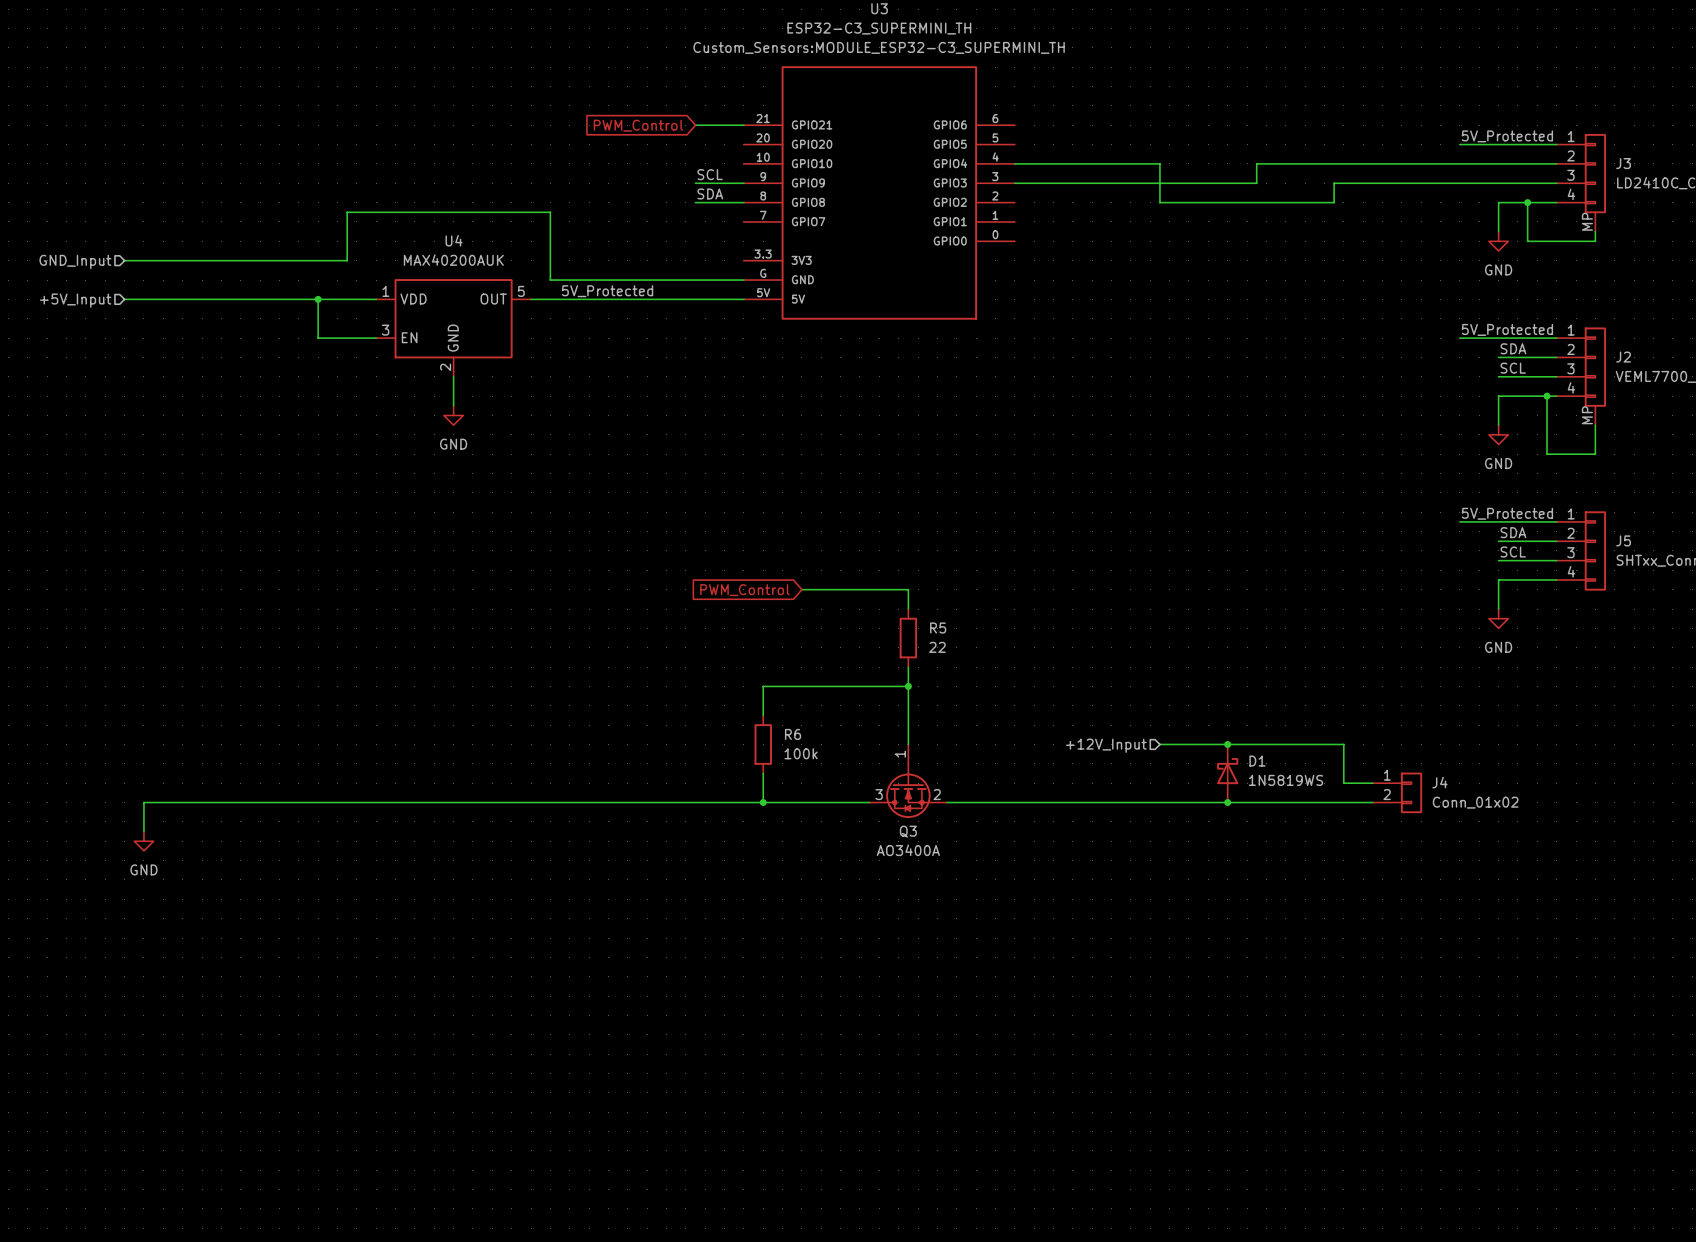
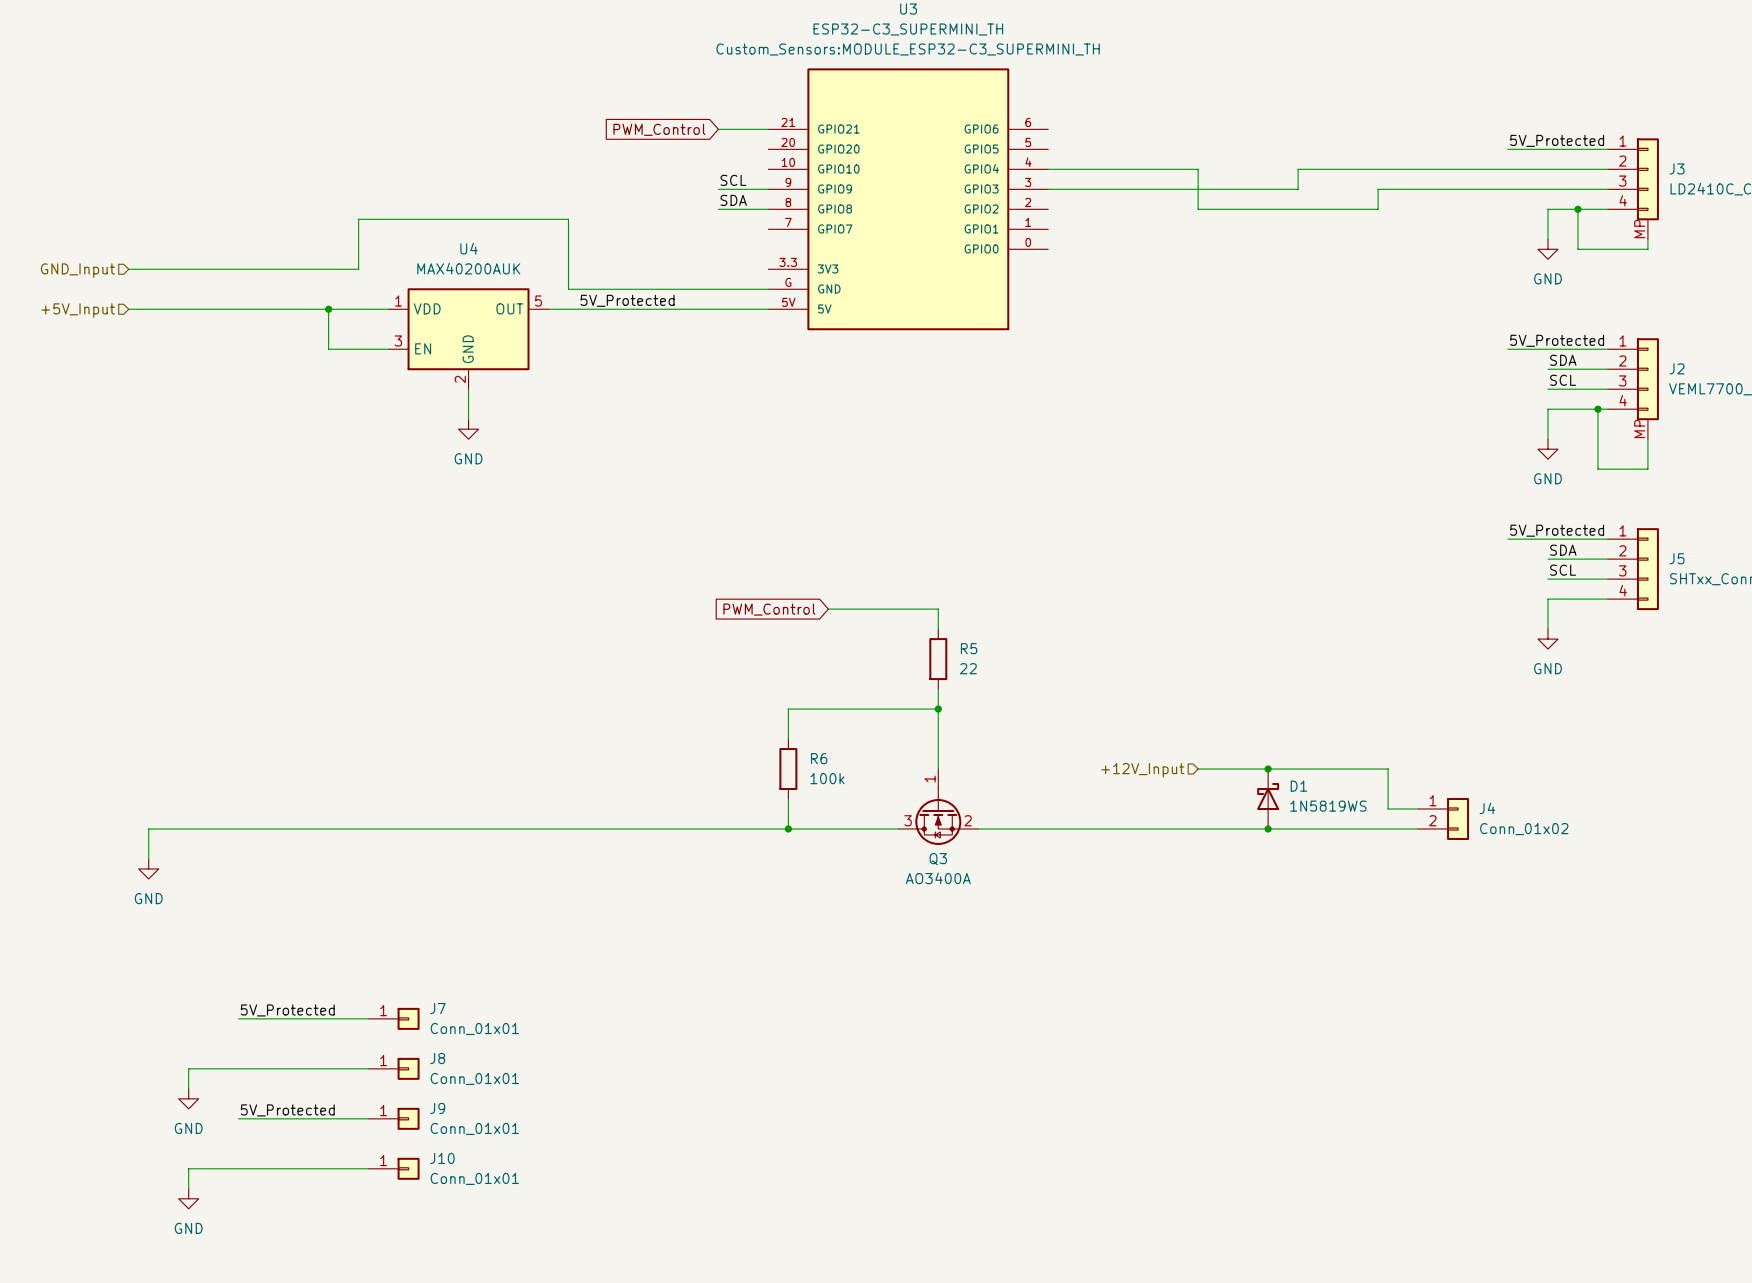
label: none -> 5V_Protected (287, 1010)
wire: none -> (238, 1018) (368, 1018)
J7: none -> Conn_01x01 (394, 1018)
wire: none -> (368, 1068) (188, 1068) (188, 1088)
J8: none -> Conn_01x01 (394, 1068)
power symbol: none -> GND (188, 1098)
label: none -> 5V_Protected (287, 1110)
wire: none -> (238, 1118) (368, 1118)
J9: none -> Conn_01x01 (394, 1118)
wire: none -> (368, 1168) (188, 1168) (188, 1188)
J10: none -> Conn_01x01 (394, 1168)
power symbol: none -> GND (188, 1198)

